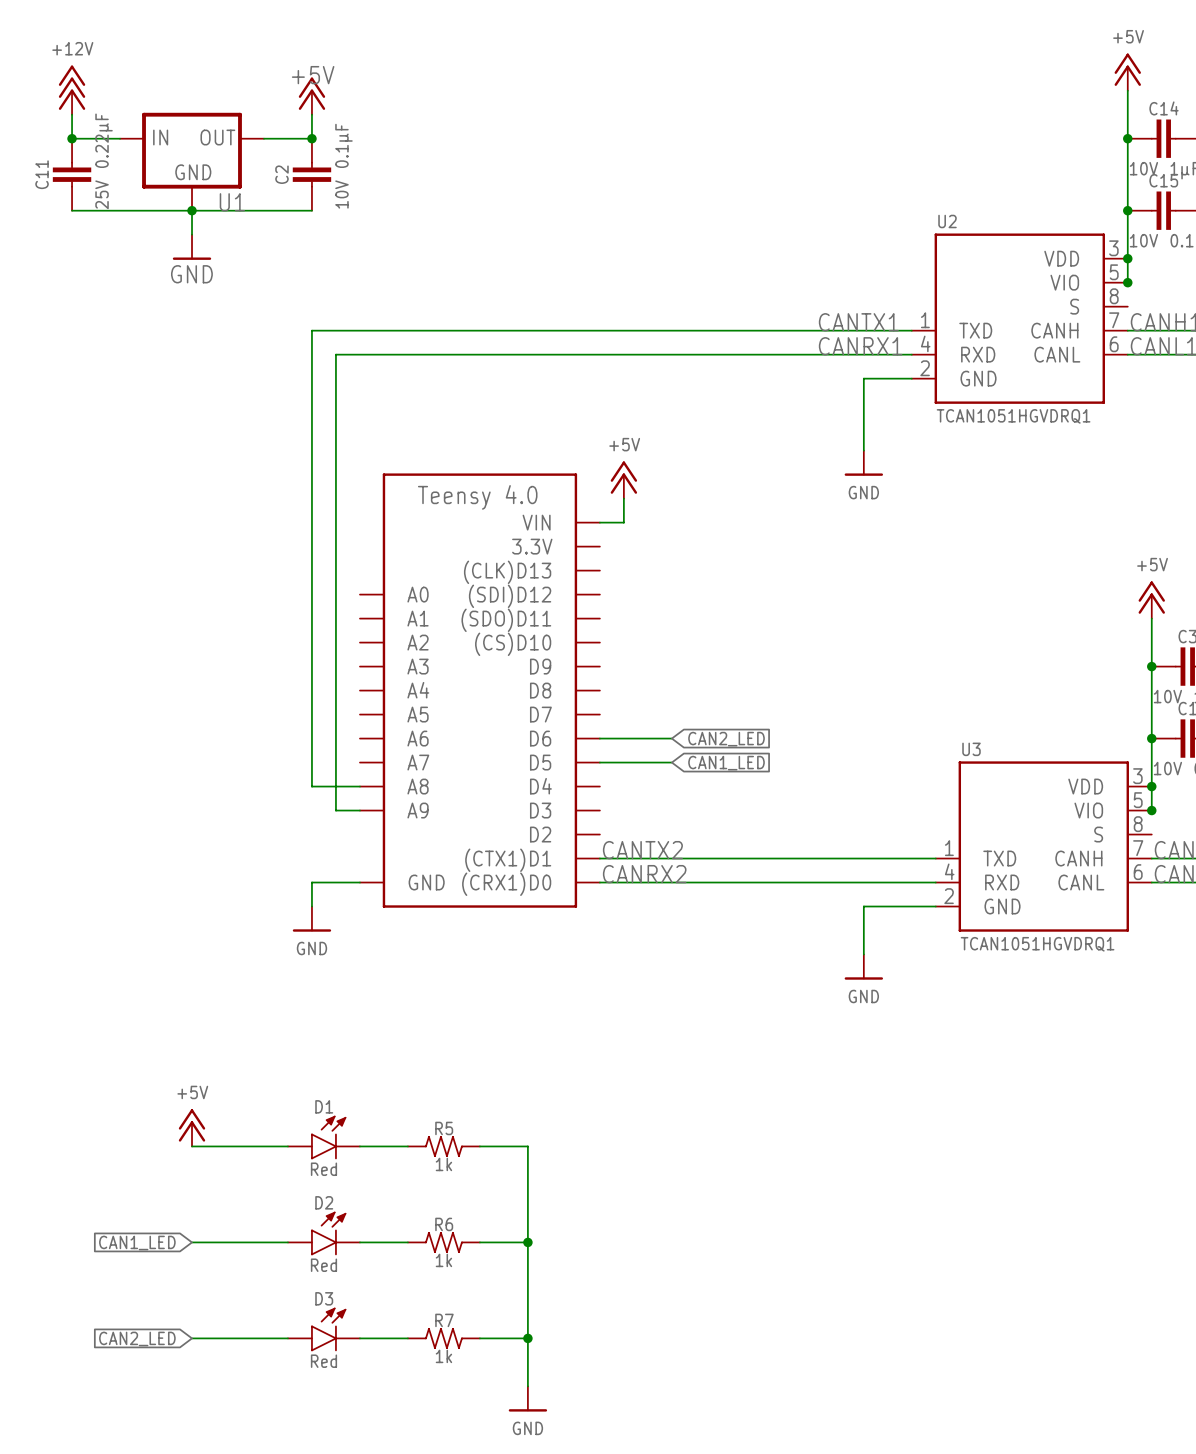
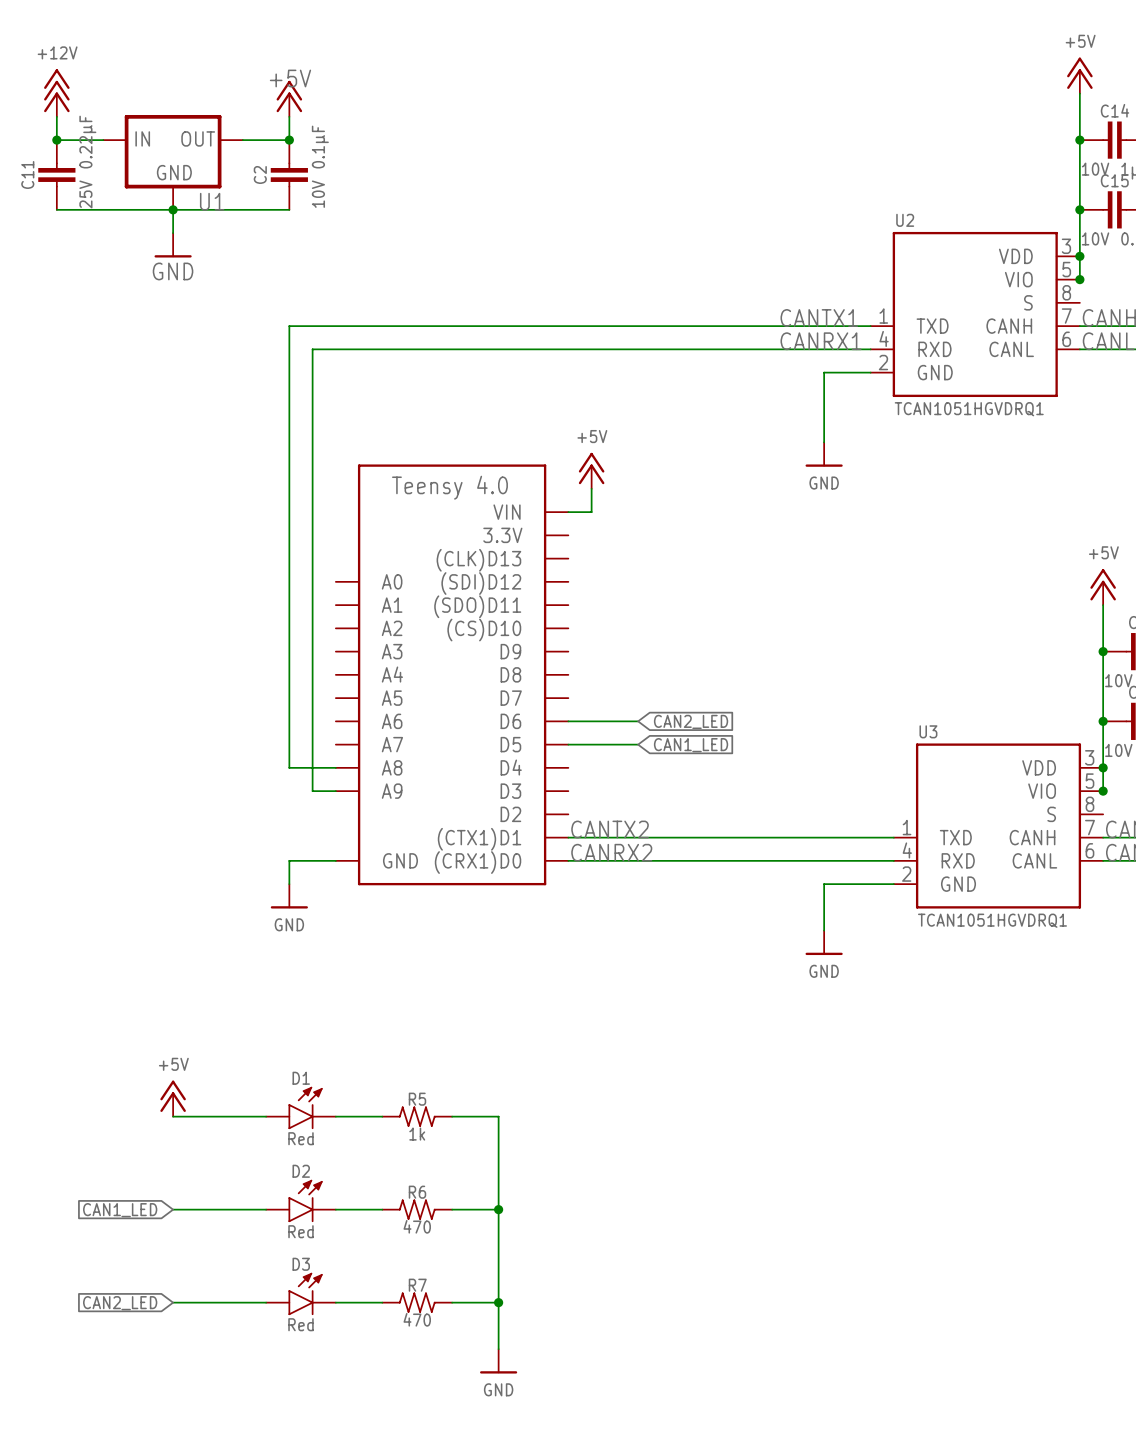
R6 text: 1k (443, 1260) -> 470 (417, 1226)
R7 text: 1k (443, 1356) -> 470 (417, 1319)

